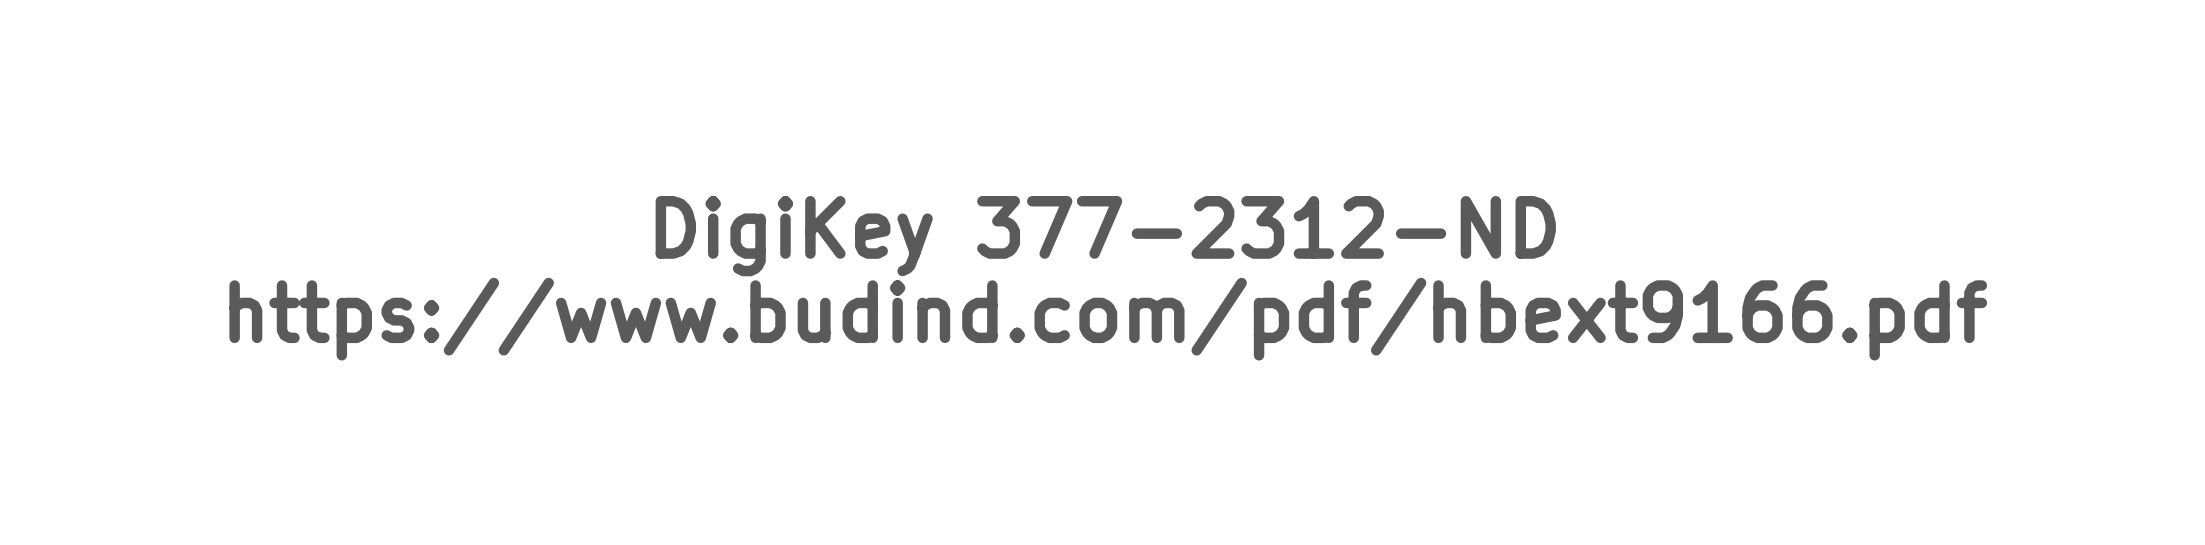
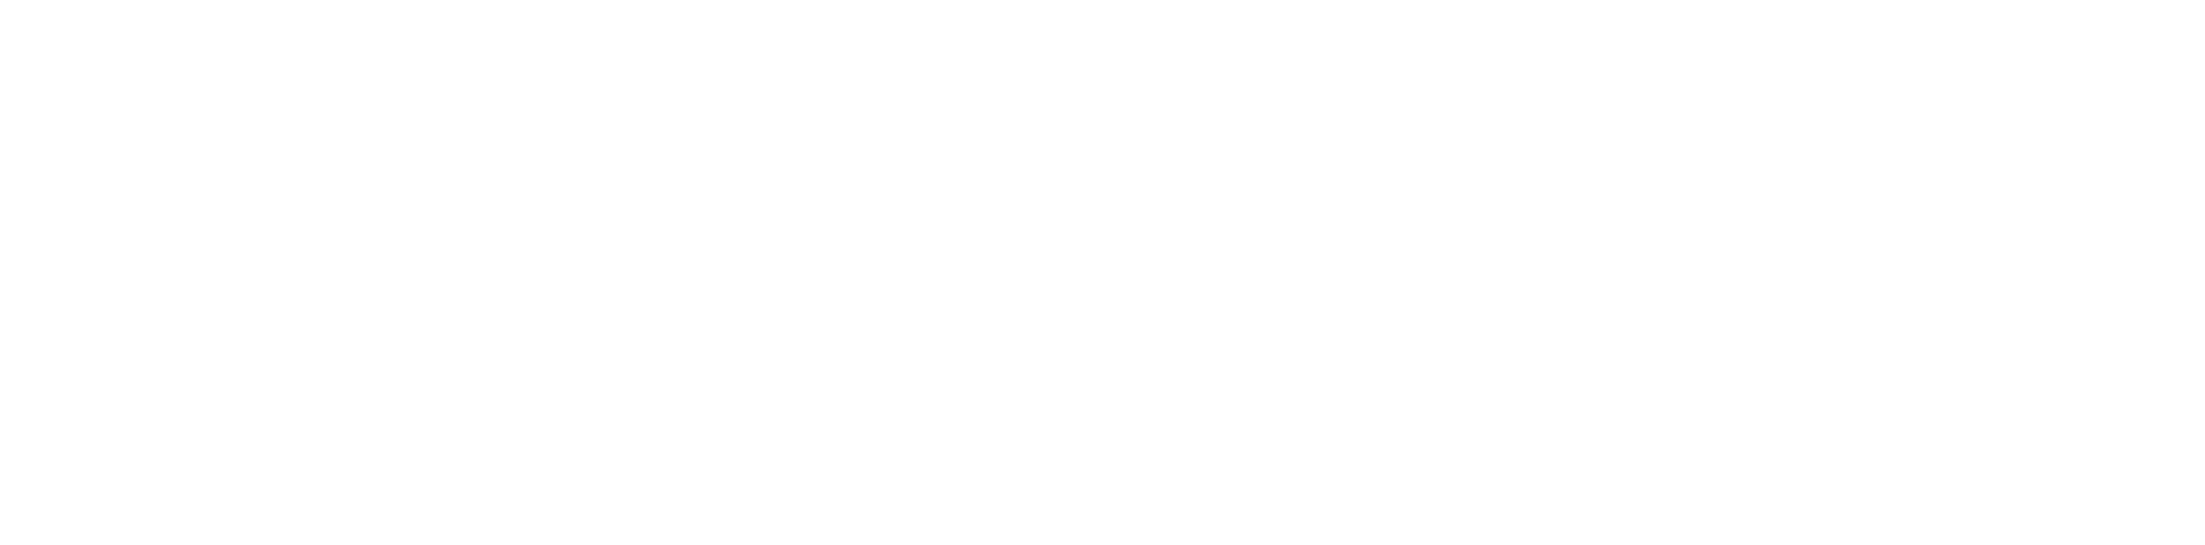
text: DigiKey 377-2312-ND (1105, 236) -> none
text: https://www.budind.com/pdf/hbext9166.pdf (1108, 319) -> none

